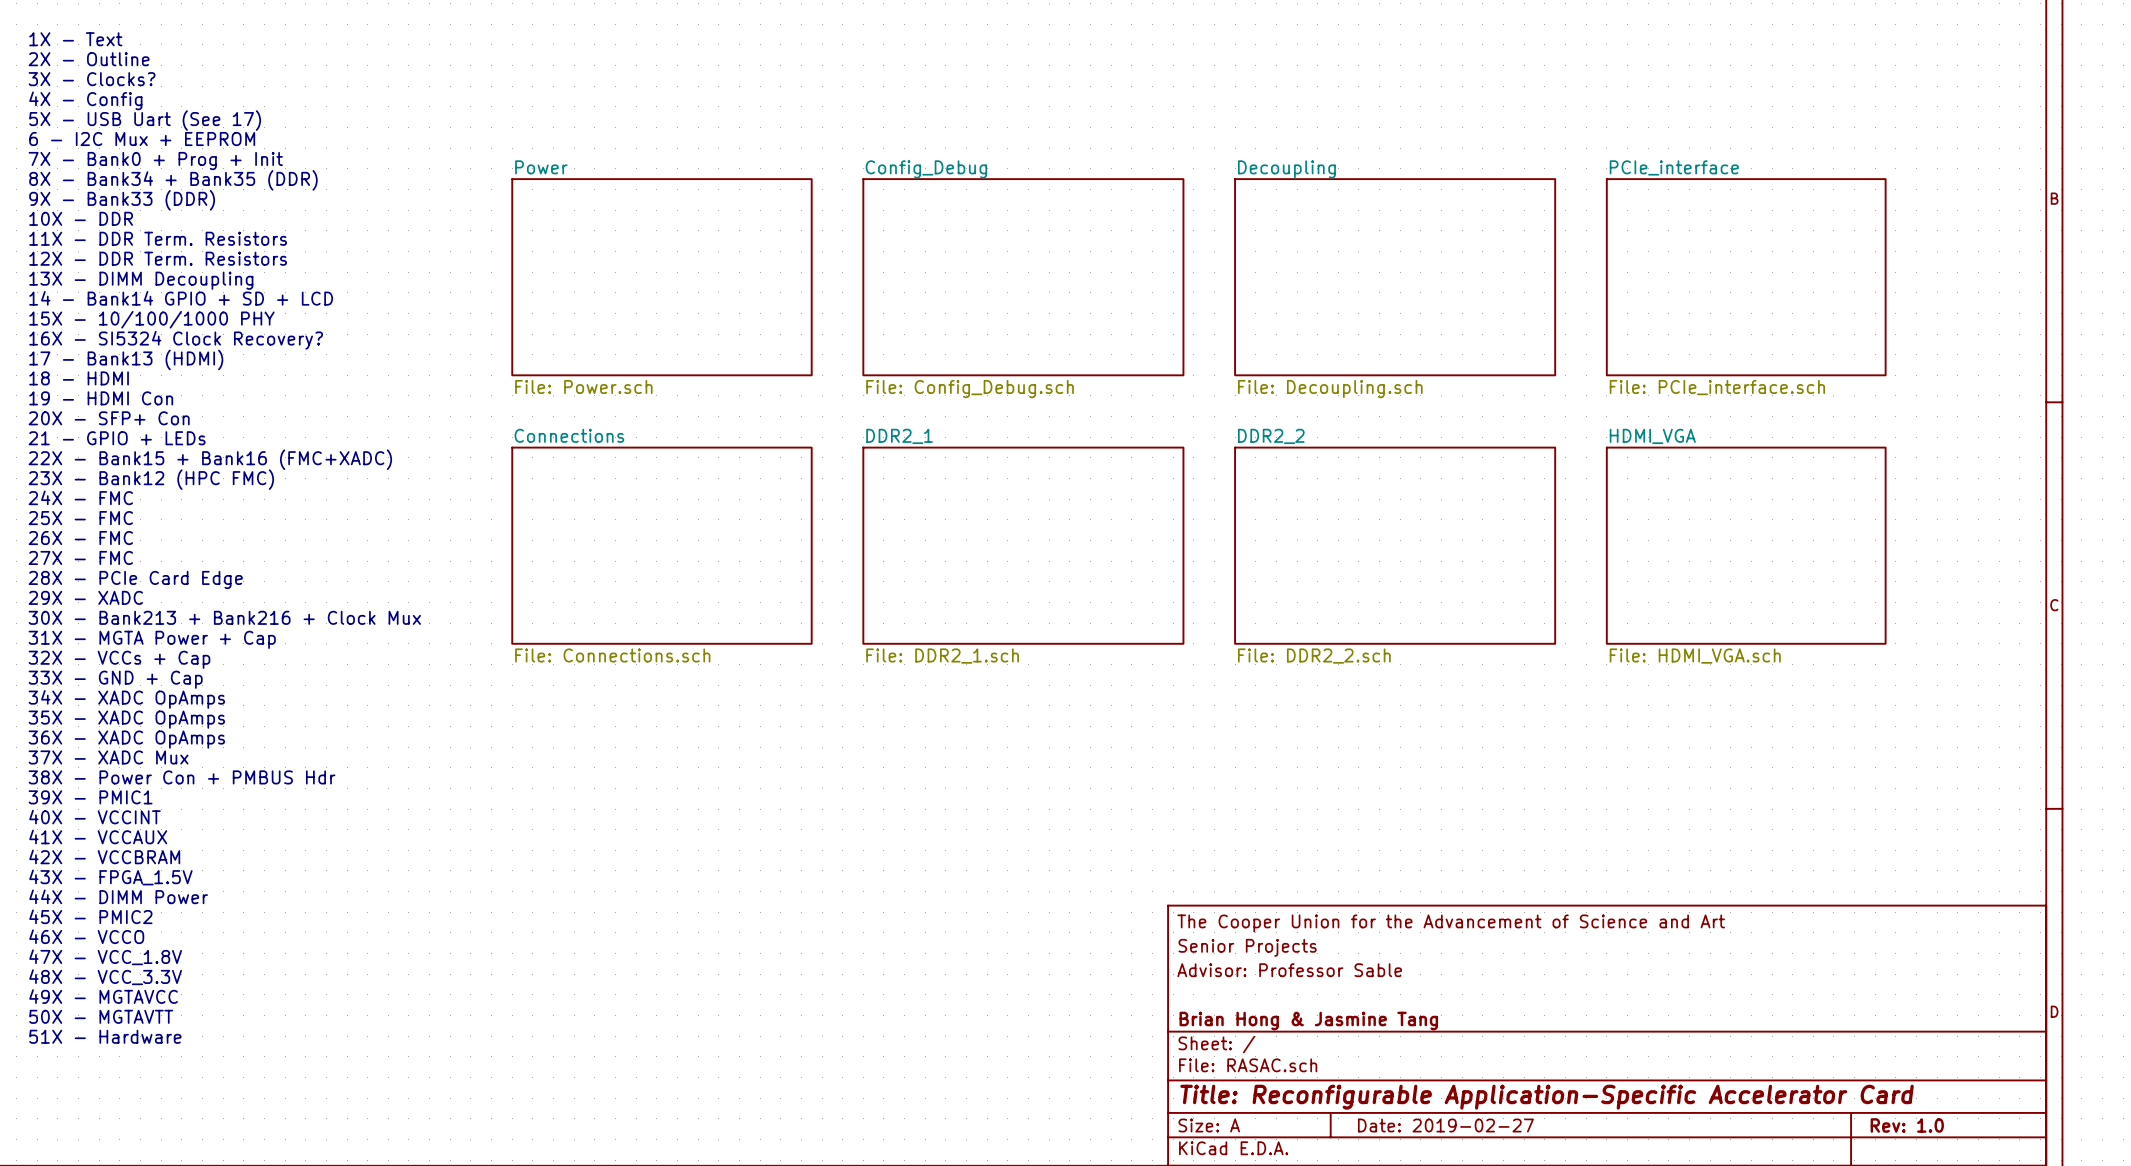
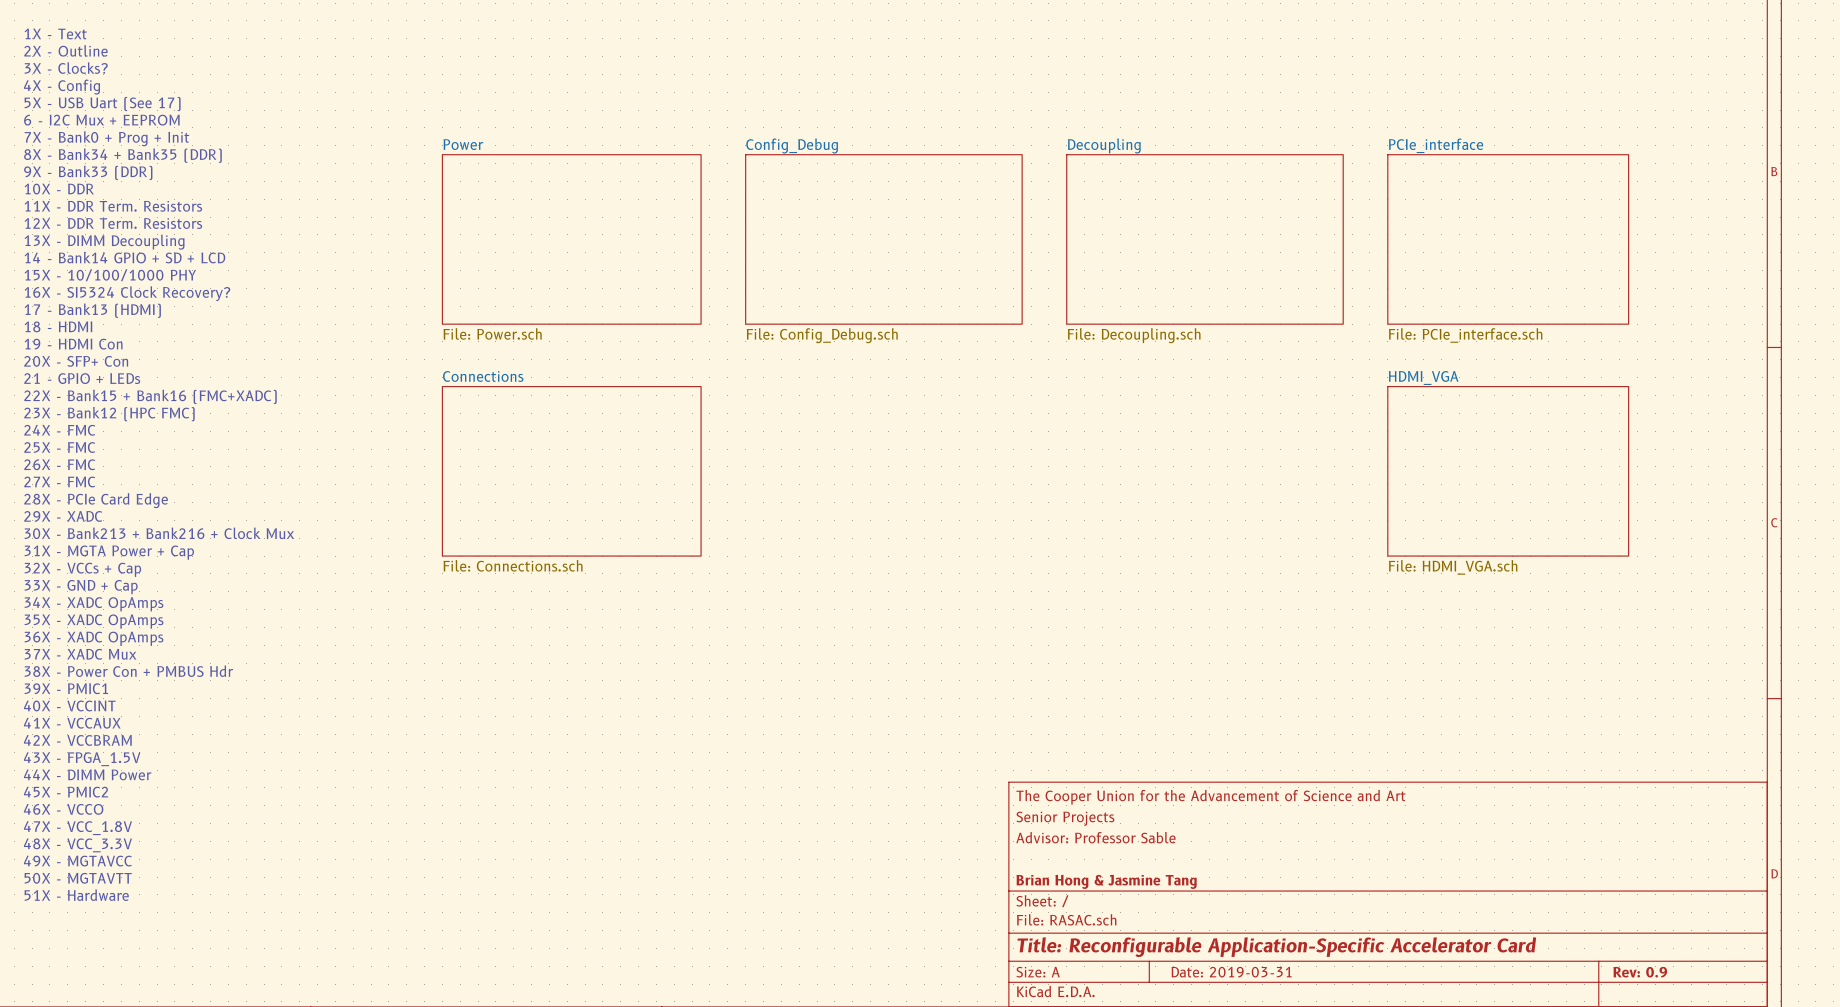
sheet DDR2_1: File: DDR2_1.sch (1023, 545) -> none
sheet DDR2_2: File: DDR2_2.sch (1395, 545) -> none
title block: Date: 2019-02-27 (1445, 1125) -> Date: 2019-03-31 (1231, 972)
title block: Rev: 1.0 (1907, 1125) -> Rev: 0.9 (1640, 972)

